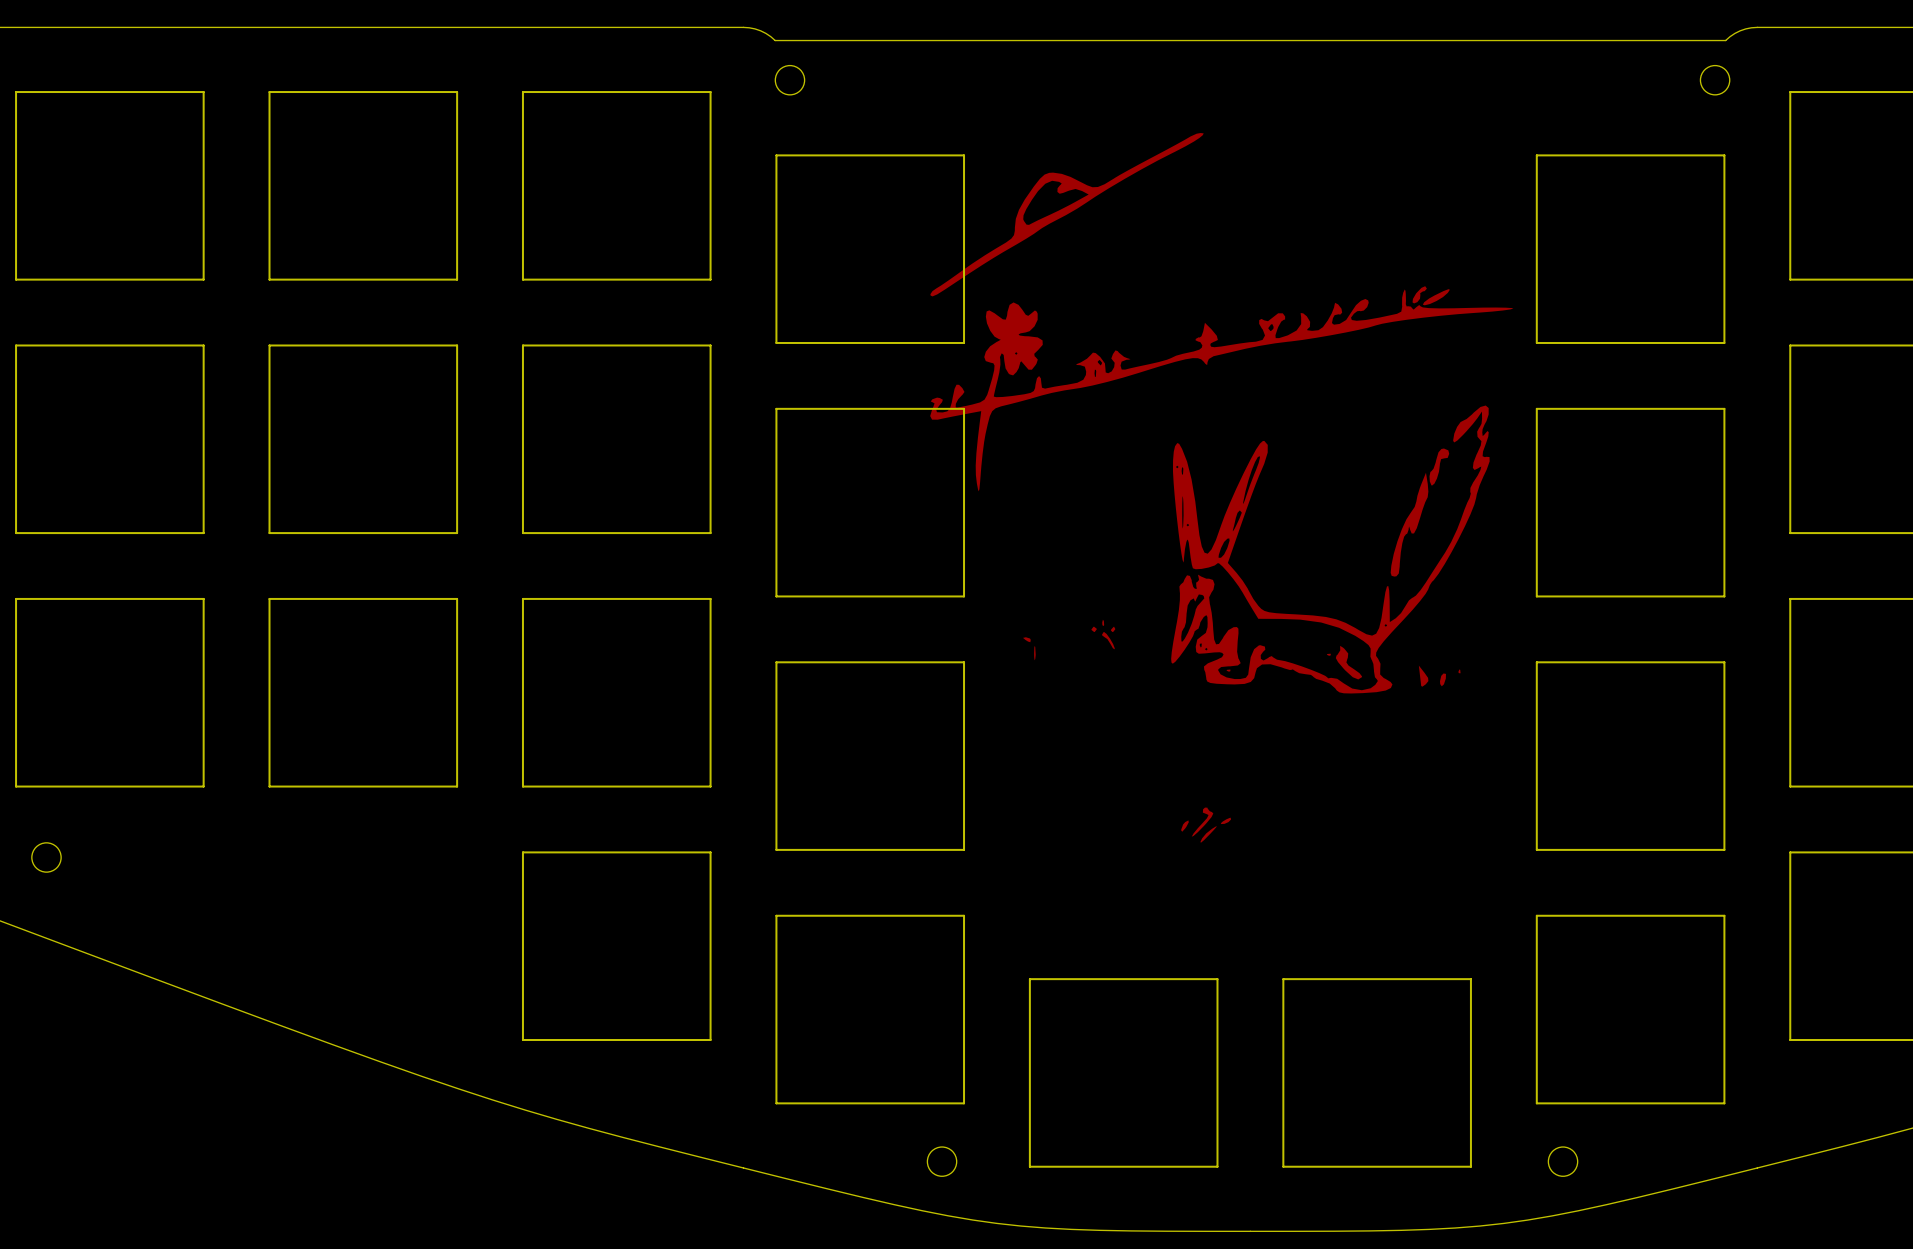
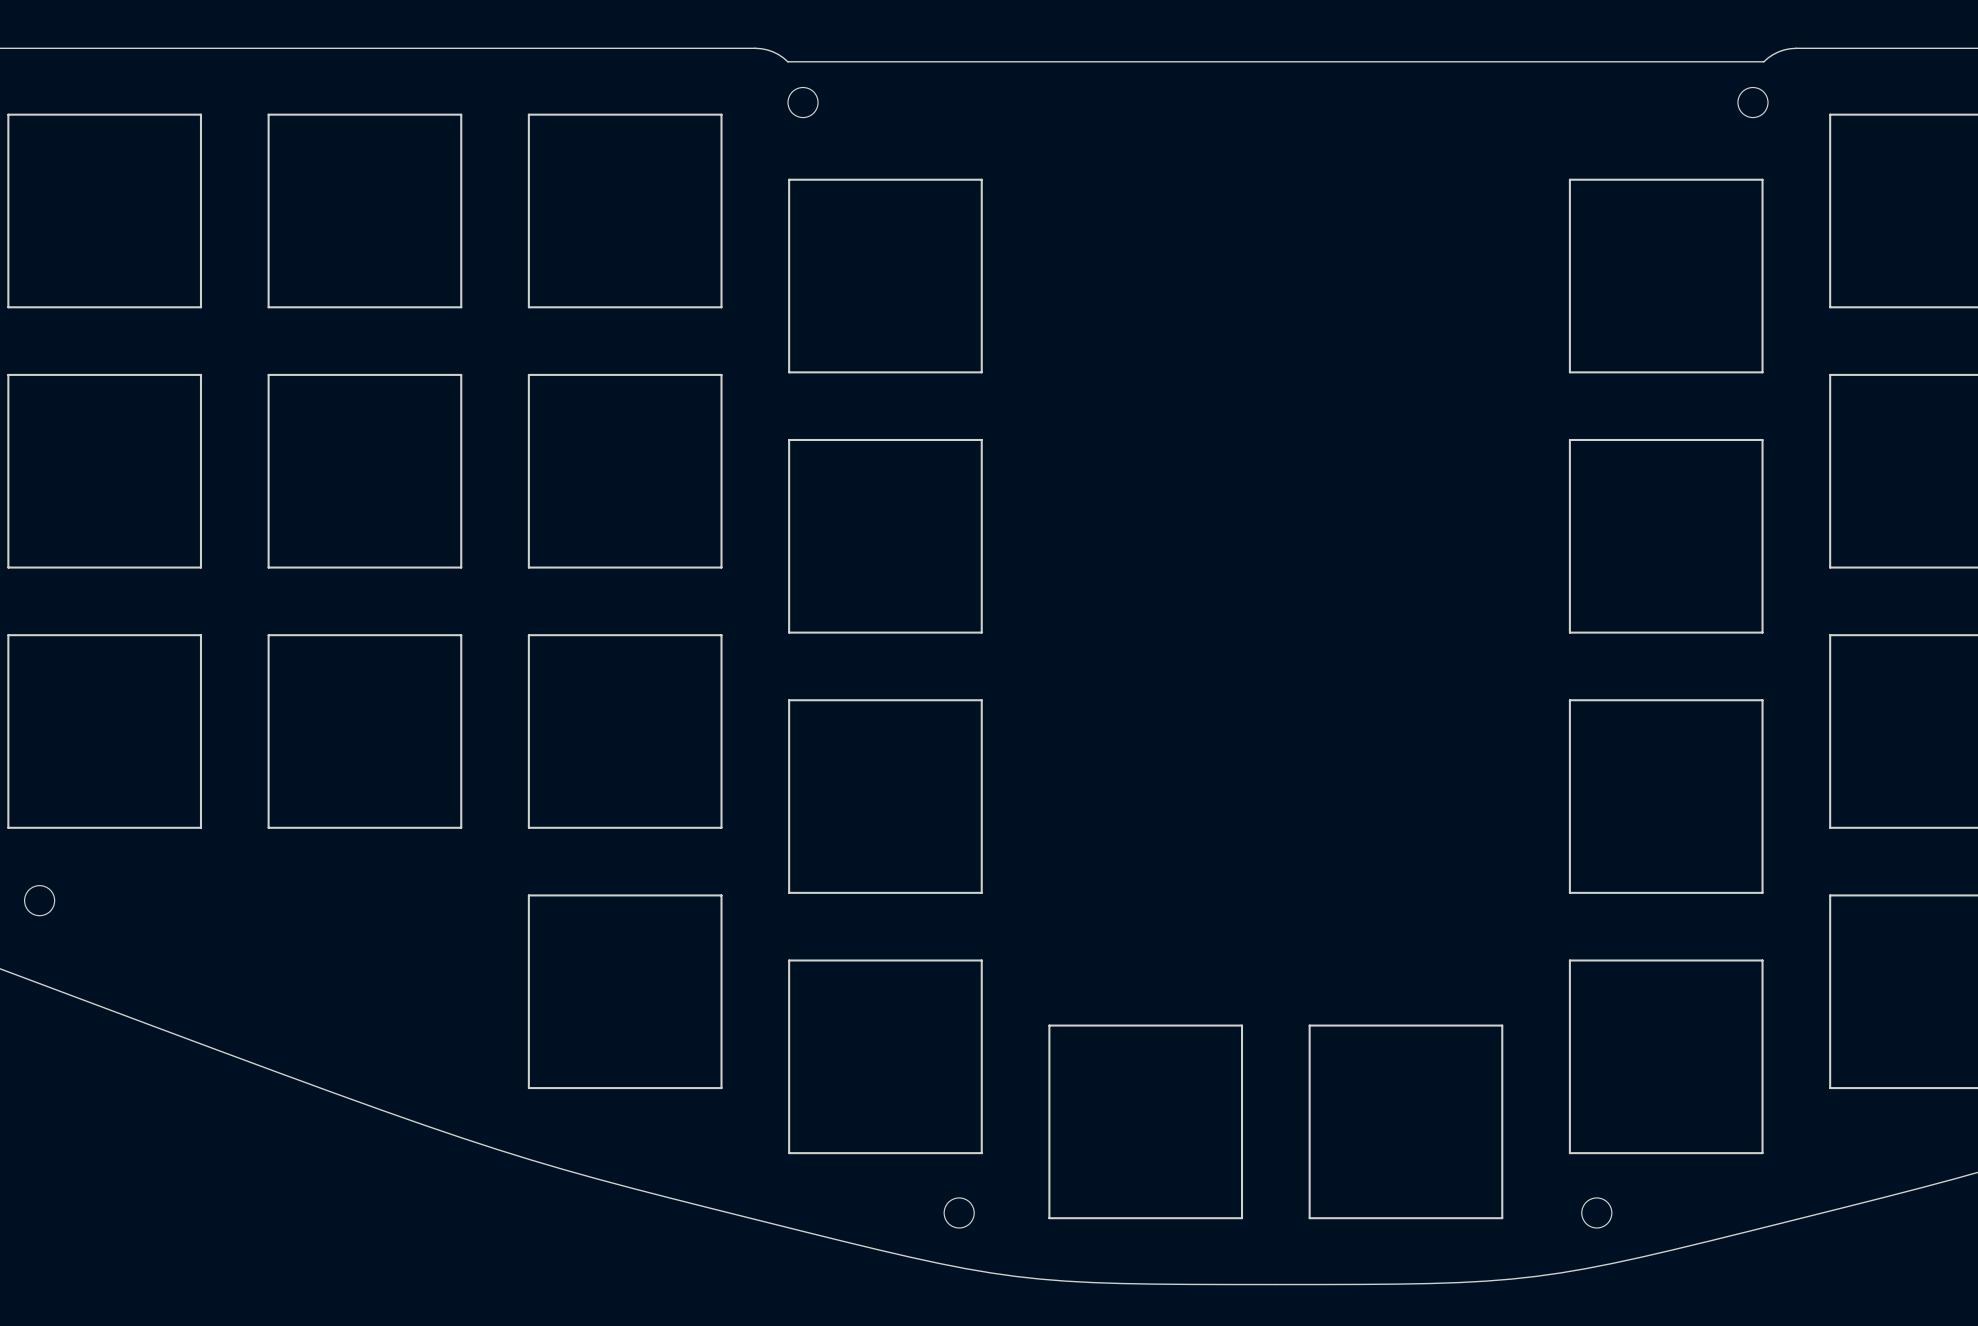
drawing: [930, 133, 1514, 843] -> none

